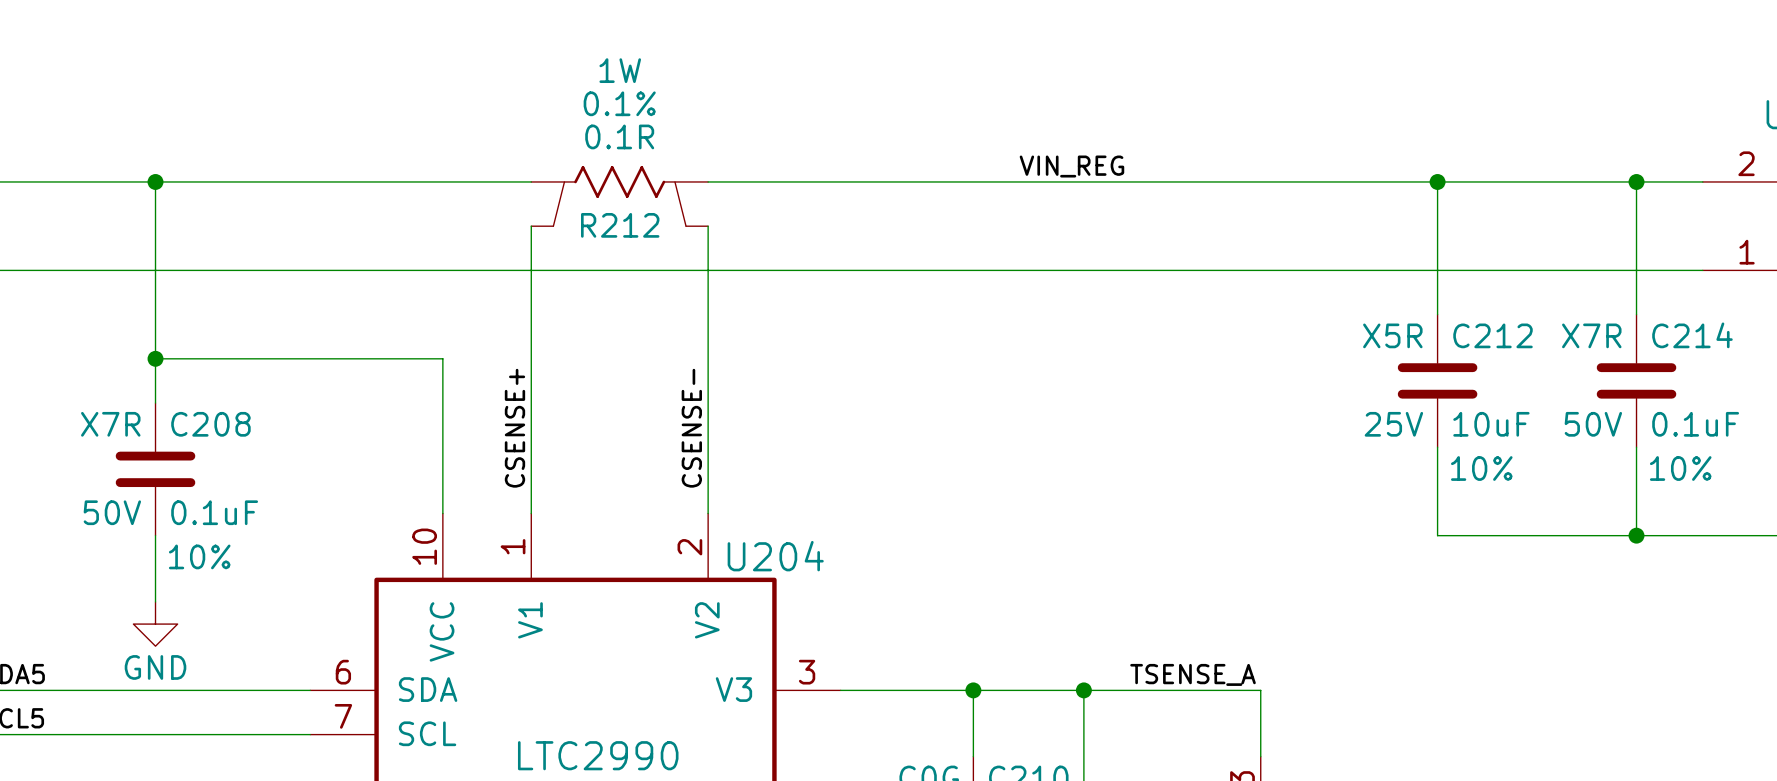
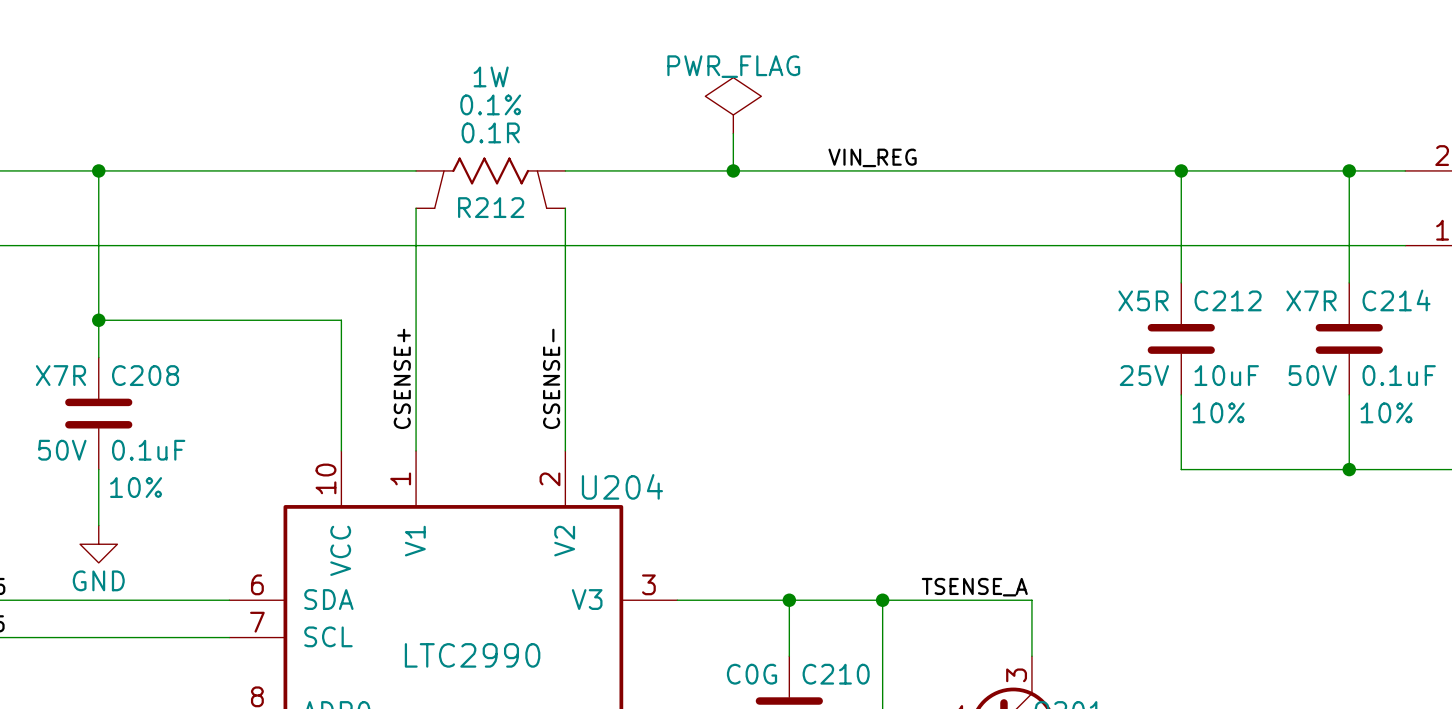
power symbol: none -> PWR_FLAG (733, 105)
wire: none -> (733, 133) (733, 170)
junction: none -> (733, 170)

